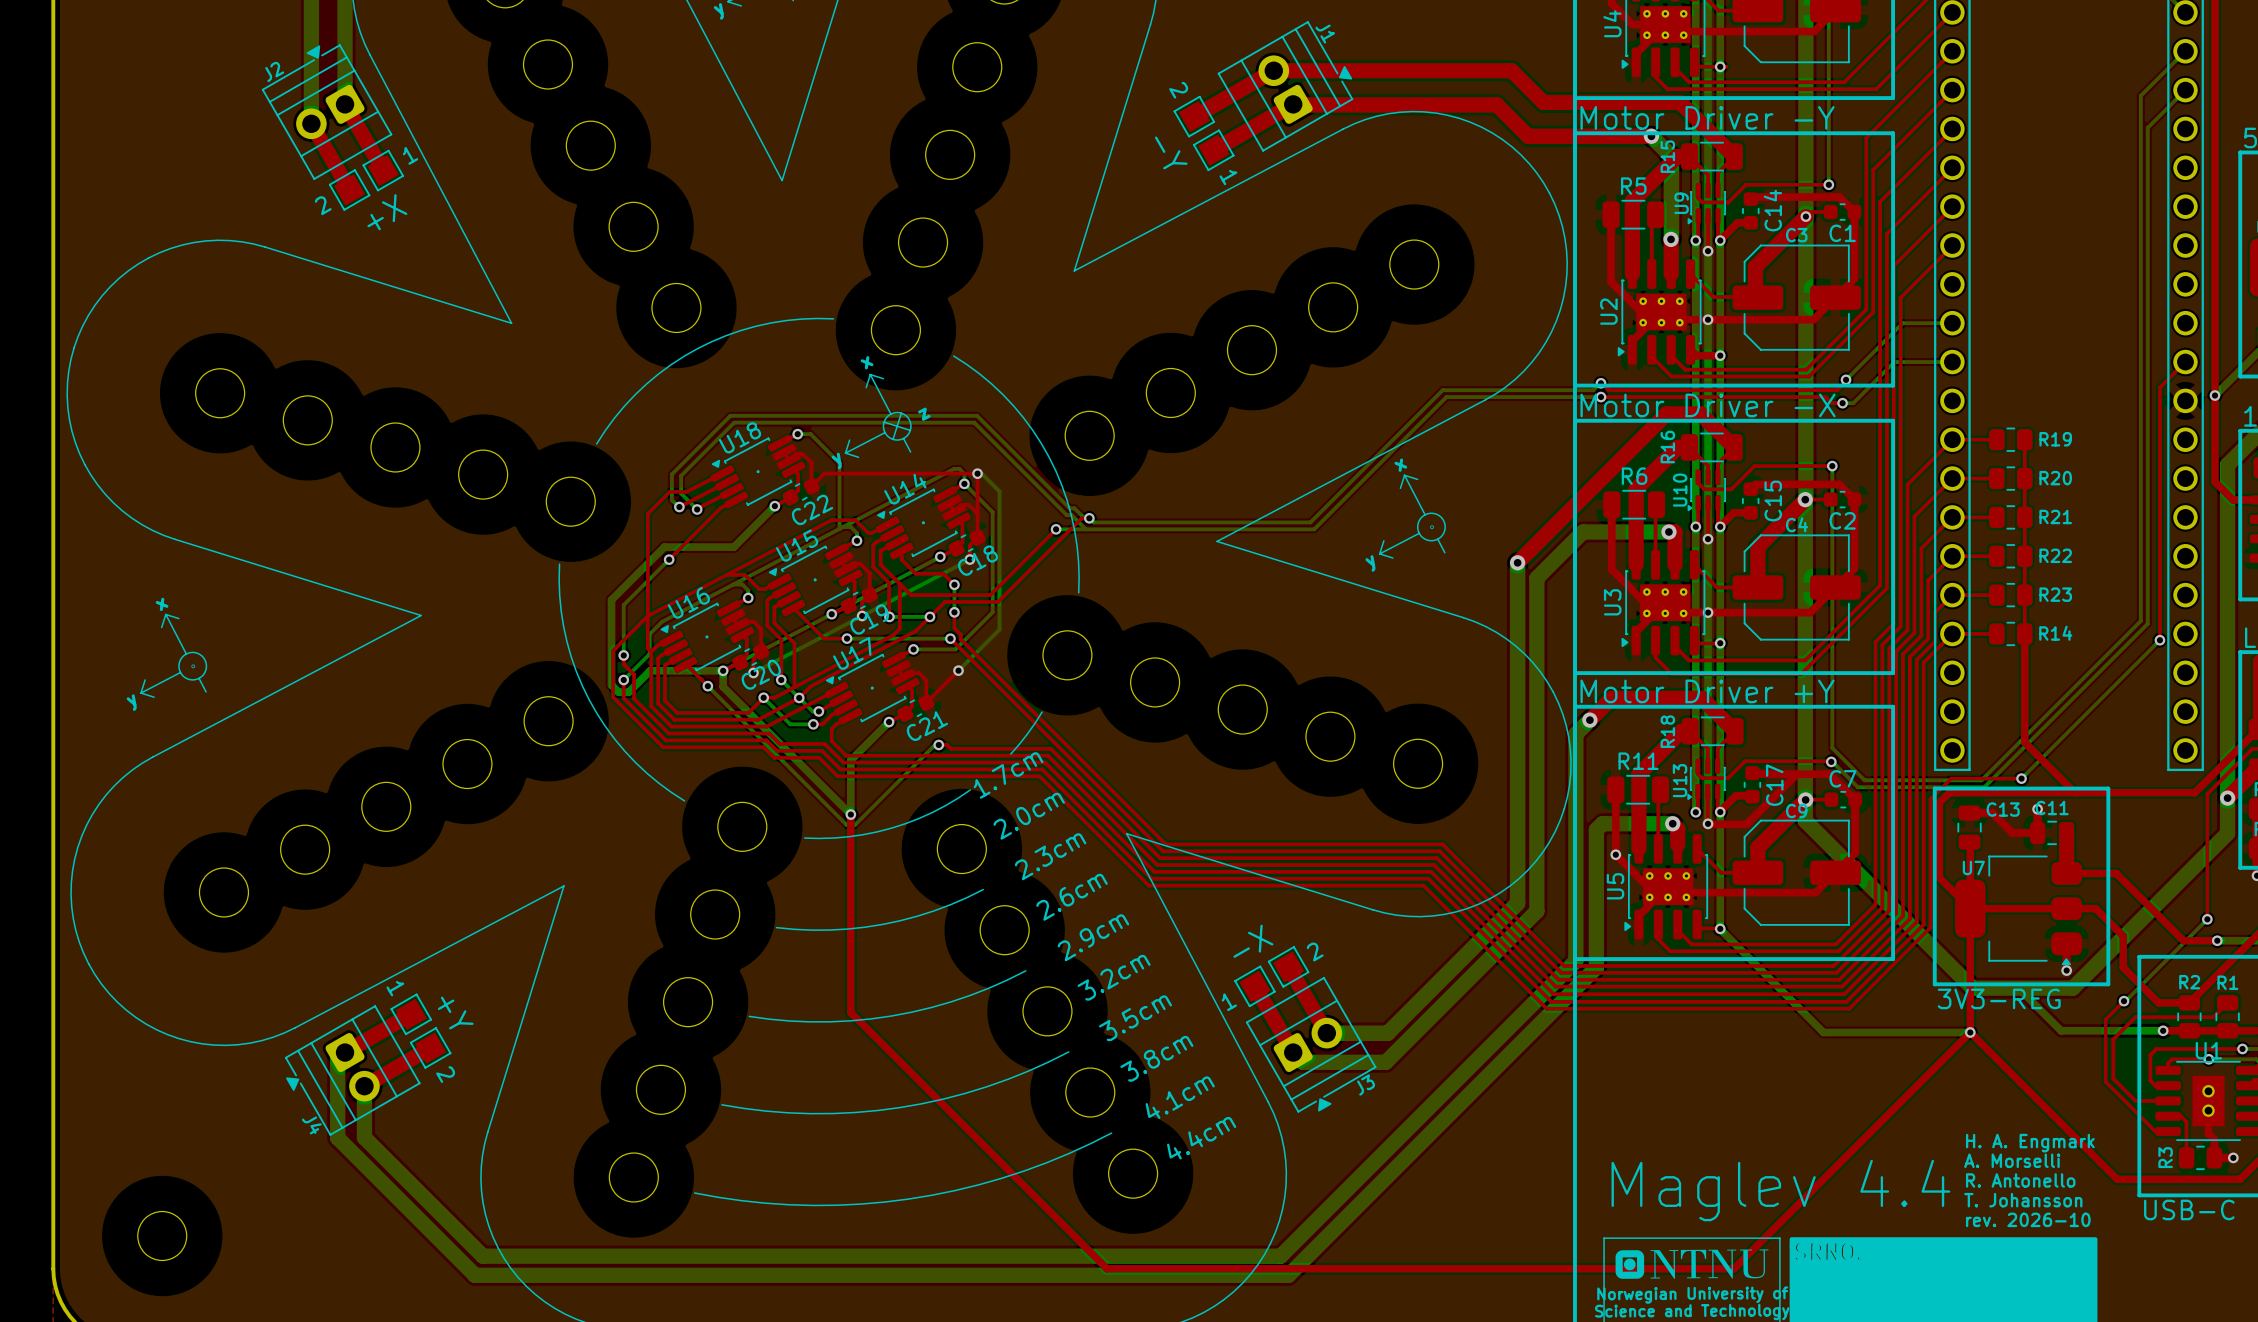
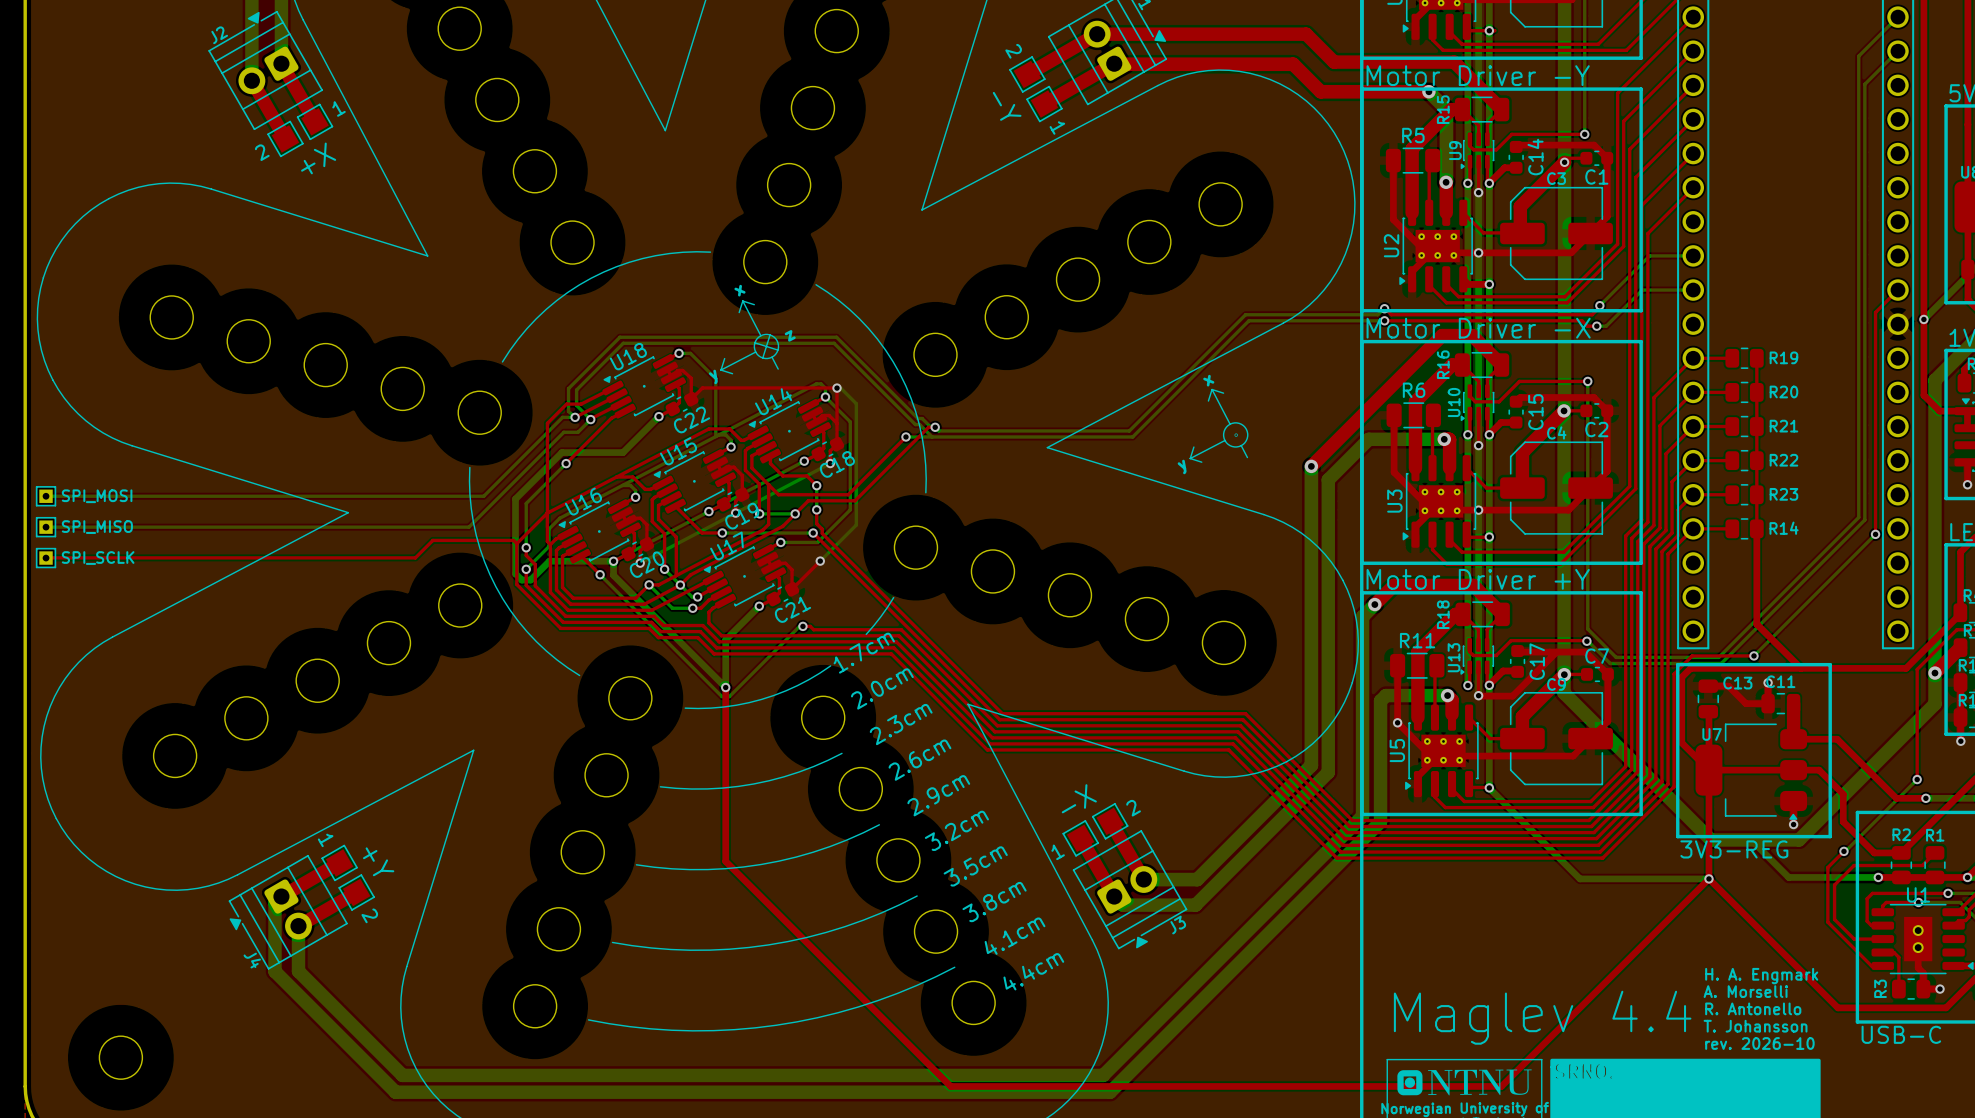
bottom track: none -> (575, 417) (562, 417) (483, 496) (46, 496)
bottom track: none -> (590, 419) (578, 432) (563, 432) (468, 527) (46, 527)
SPI_MOSI: none -> (46, 496)
text: x (162, 604) -> none
line: (165, 614) (161, 627) -> none
line: (165, 614) (178, 618) -> none
line: (165, 614) (186, 653) -> none
SPI_MISO: none -> (46, 527)
top track: none -> (516, 543) (513, 540) (432, 540) (415, 557) (46, 557)
drawing: [178, 651, 208, 681] -> none
SPI_SCLK: none -> (46, 558)
line: (180, 672) (140, 693) -> none
line: (199, 678) (206, 691) -> none
line: (145, 679) (140, 693) -> none
line: (140, 693) (154, 697) -> none
text: y (131, 702) -> none

